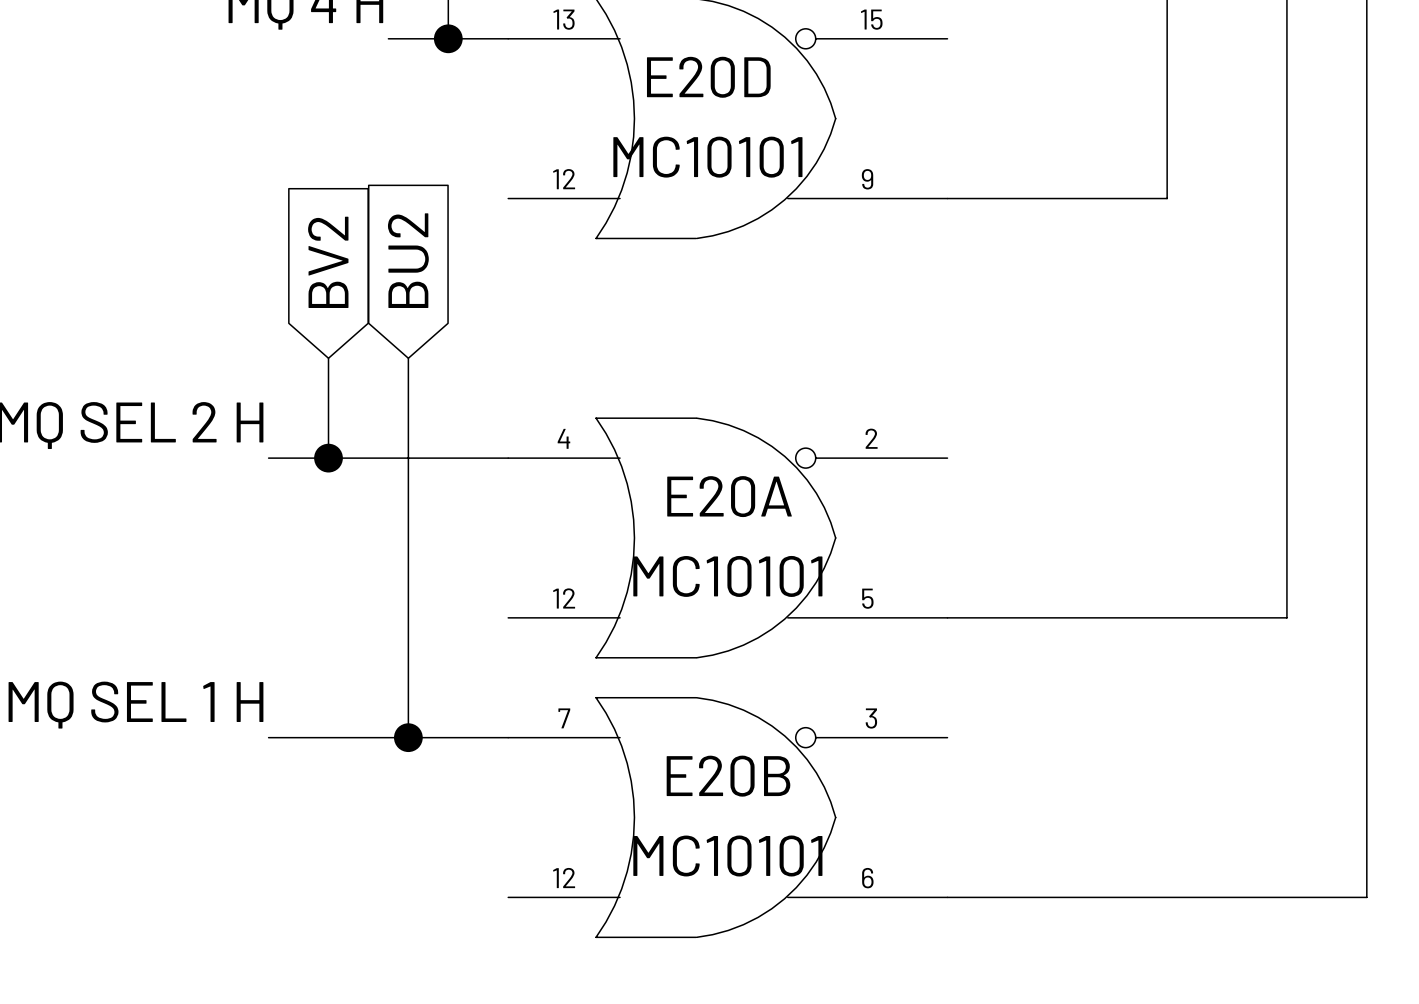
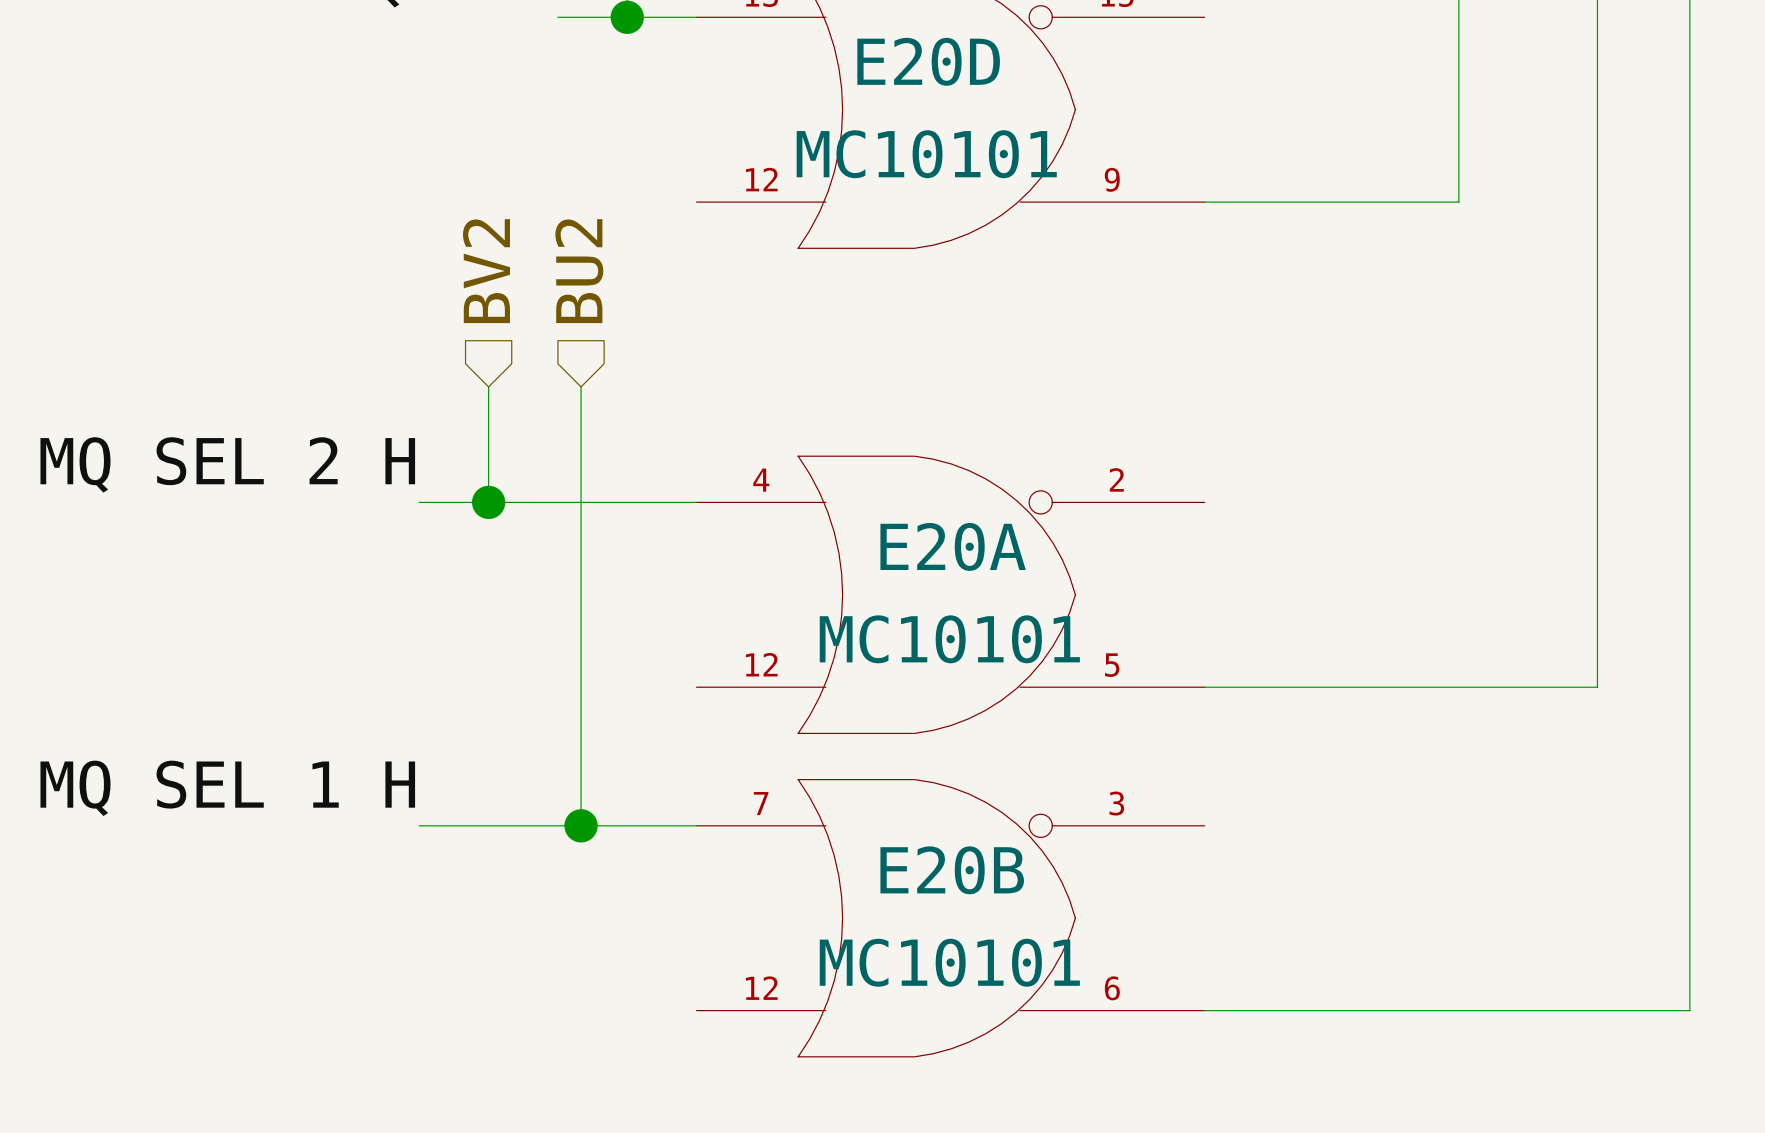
hierarchical label: none -> BU2 (579, 271)
hierarchical label: none -> BV2 (486, 271)
global label: BU2 (408, 260) -> none
global label: BV2 (328, 262) -> none

